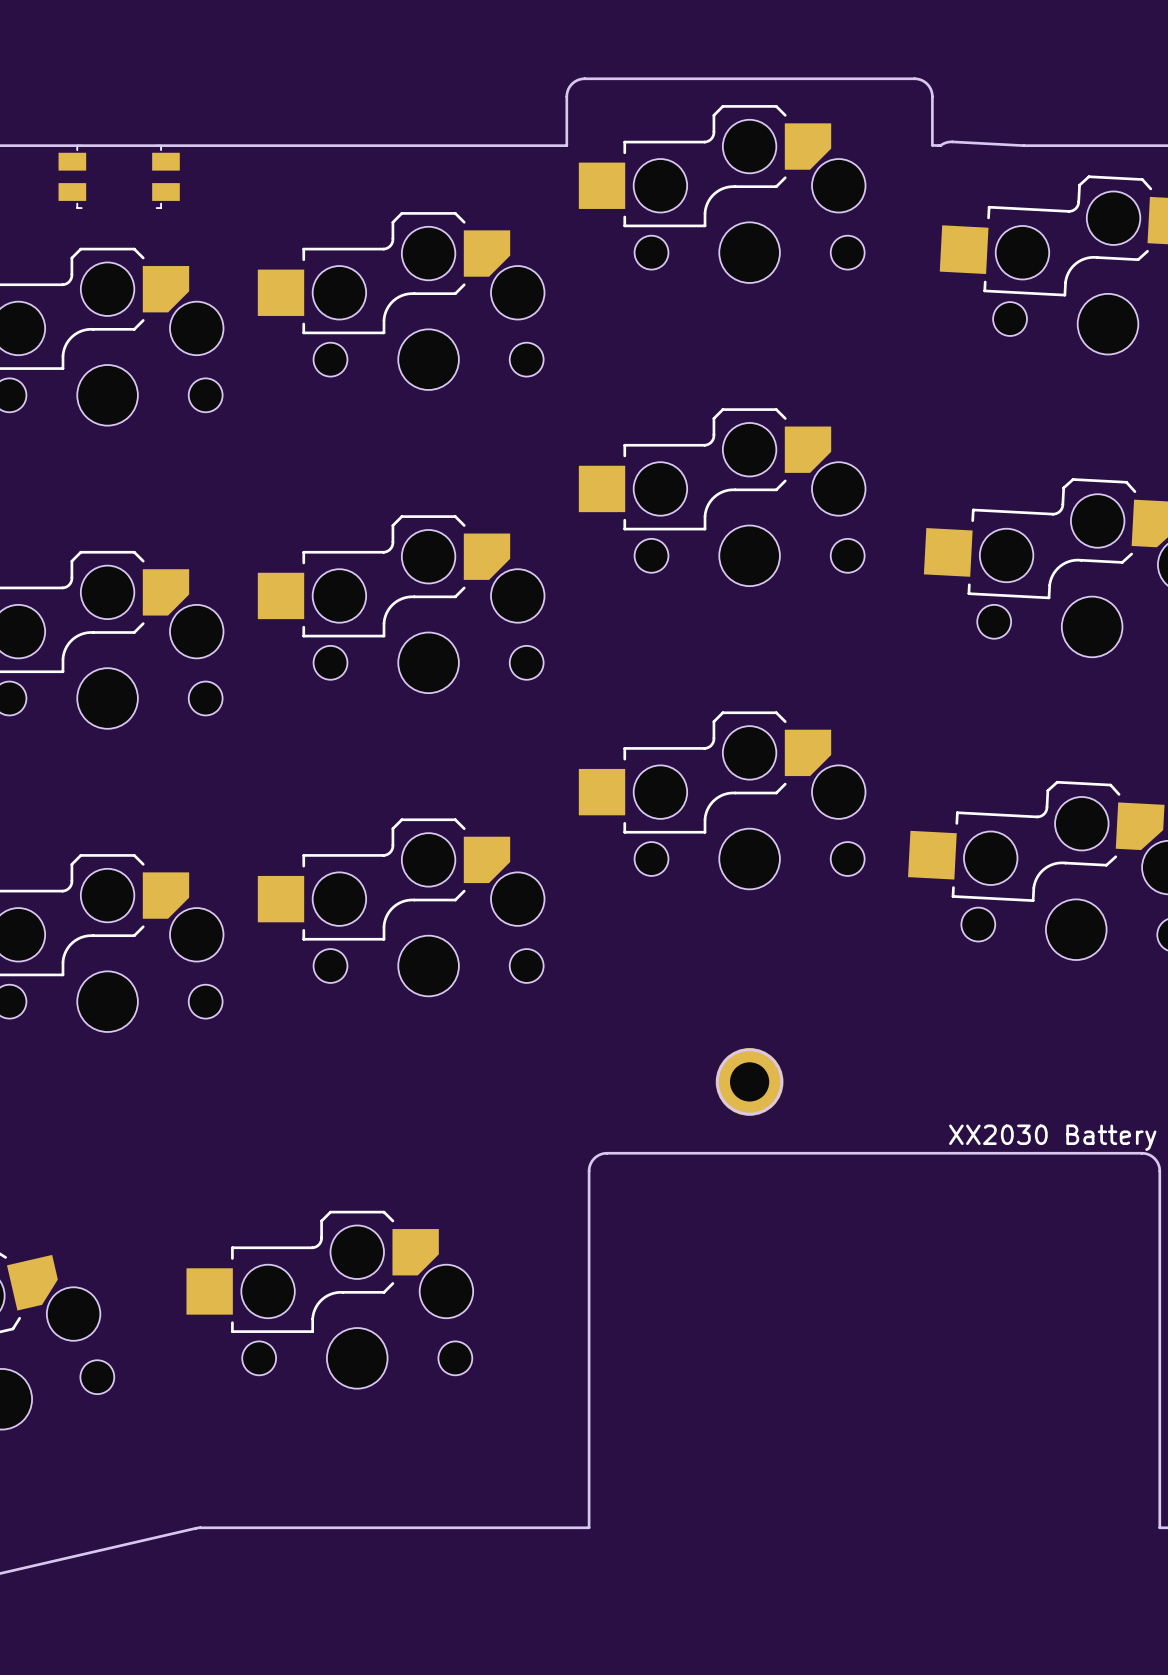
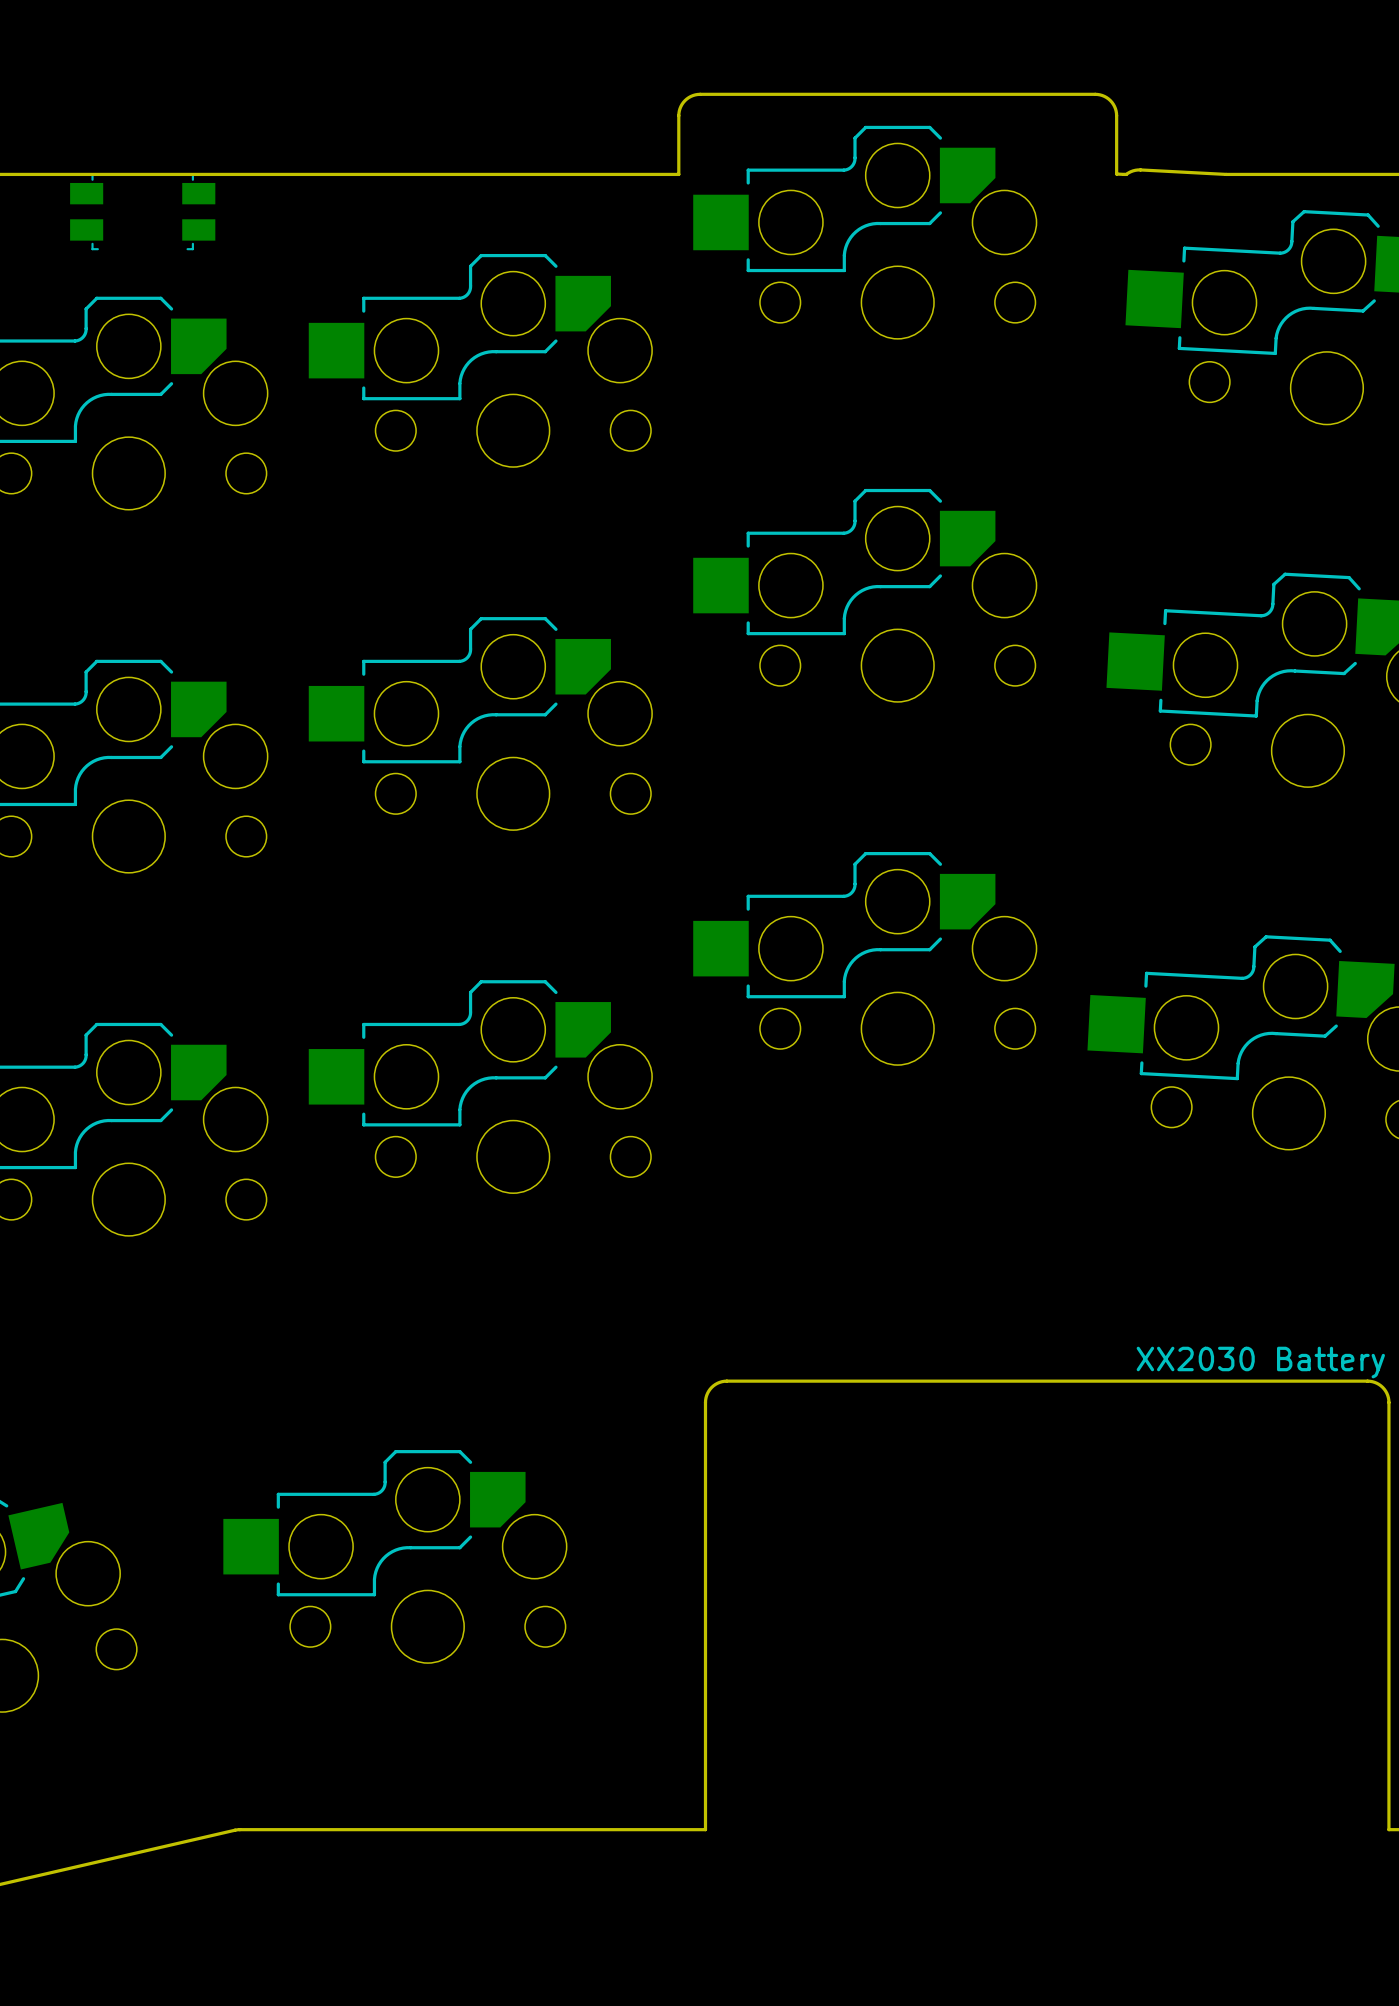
round board edge: [716, 1048, 784, 1116] -> none
part: (749, 1081) -> none

